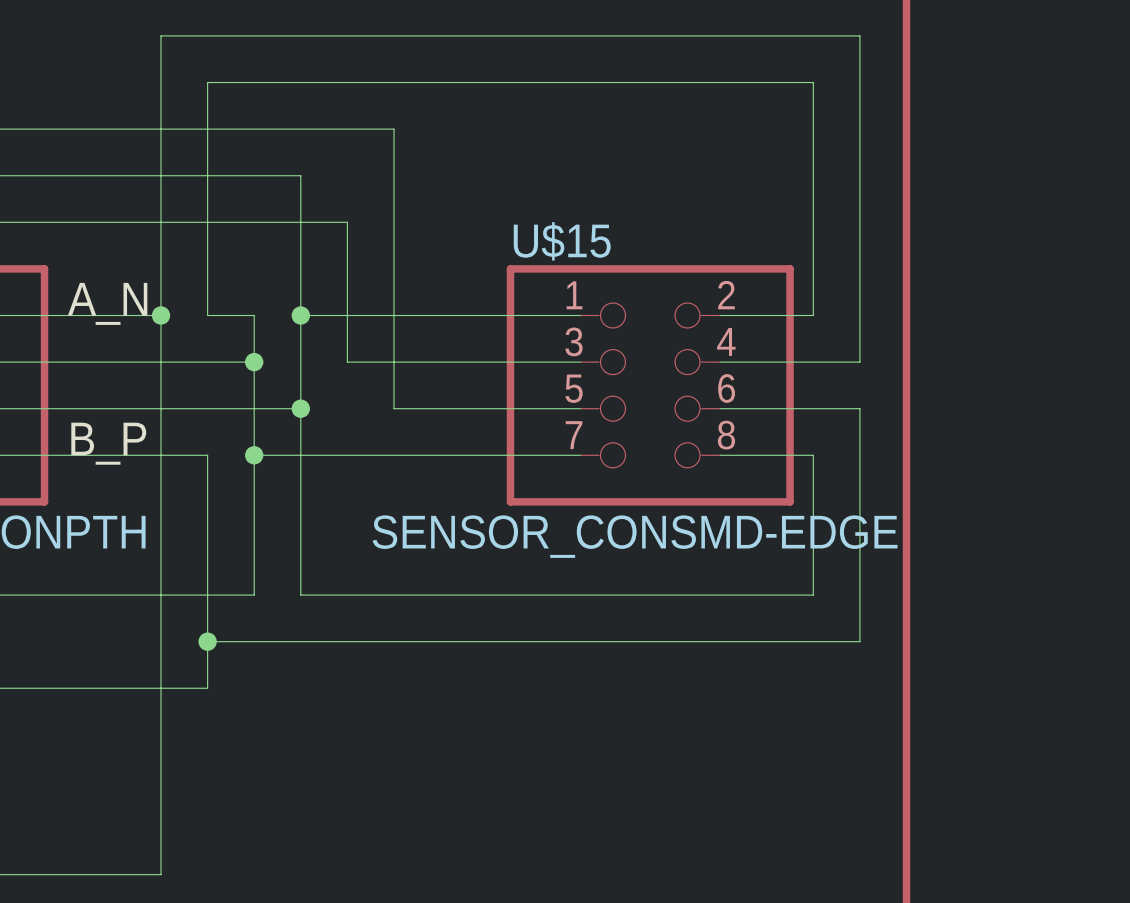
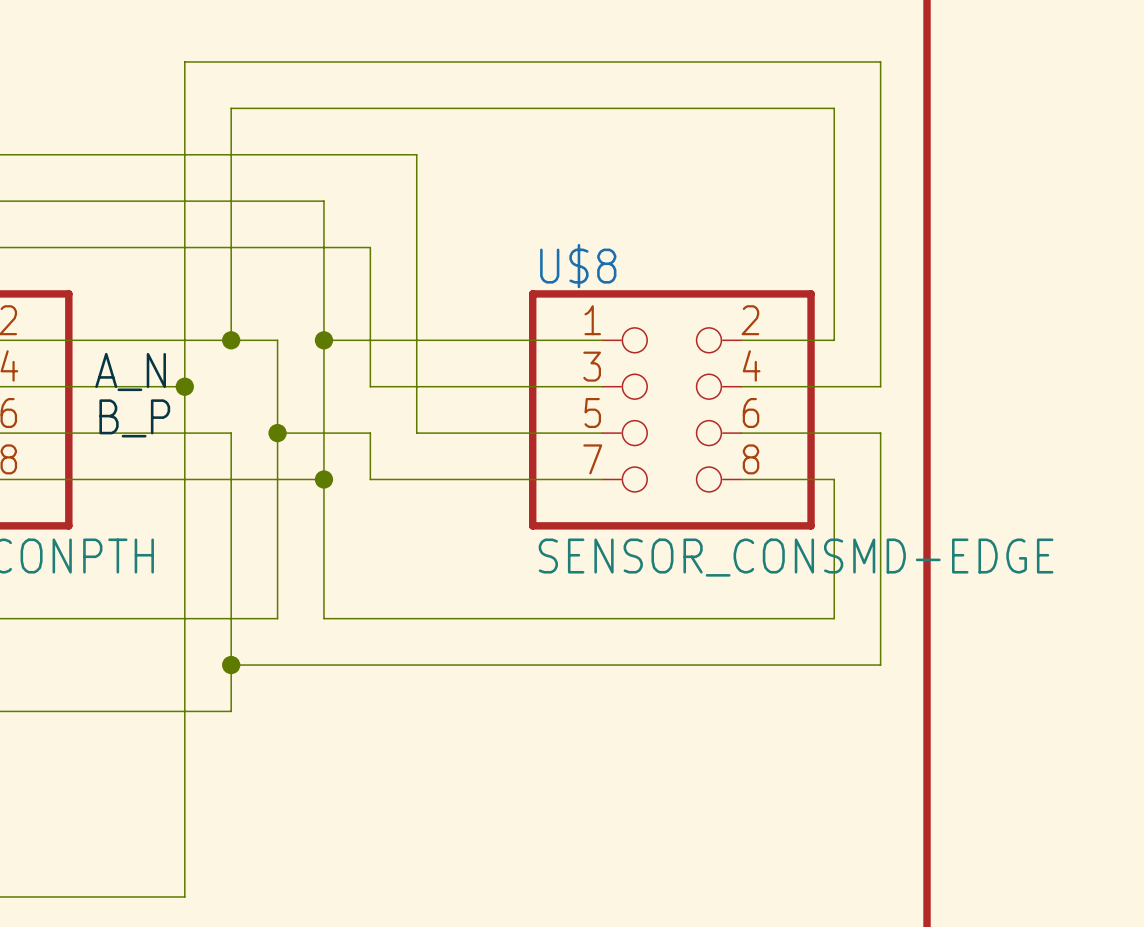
U$15 name: U$15 (562, 241) -> U$8 (578, 266)
label position: A_N (107, 303) -> A_N (130, 372)
wire: none -> (184, 340) (231, 340)
junction: (161, 315) -> none
junction: none -> (231, 340)
wire: (161, 362) (254, 362) -> none
junction: none -> (184, 386)
junction: (254, 362) -> none
wire: (207, 408) (254, 408) -> (231, 433) (231, 479) (277, 479)
junction: none -> (277, 433)
junction: (300, 408) -> none
label position: B_P (108, 443) -> B_P (134, 418)
junction: (254, 455) -> none
wire: (300, 455) (347, 455) -> (323, 433) (370, 433) (370, 479)
junction: none -> (323, 479)
U$15 value position: SENSOR_CONSMD-EDGE (635, 536) -> SENSOR_CONSMD-EDGE (796, 557)

